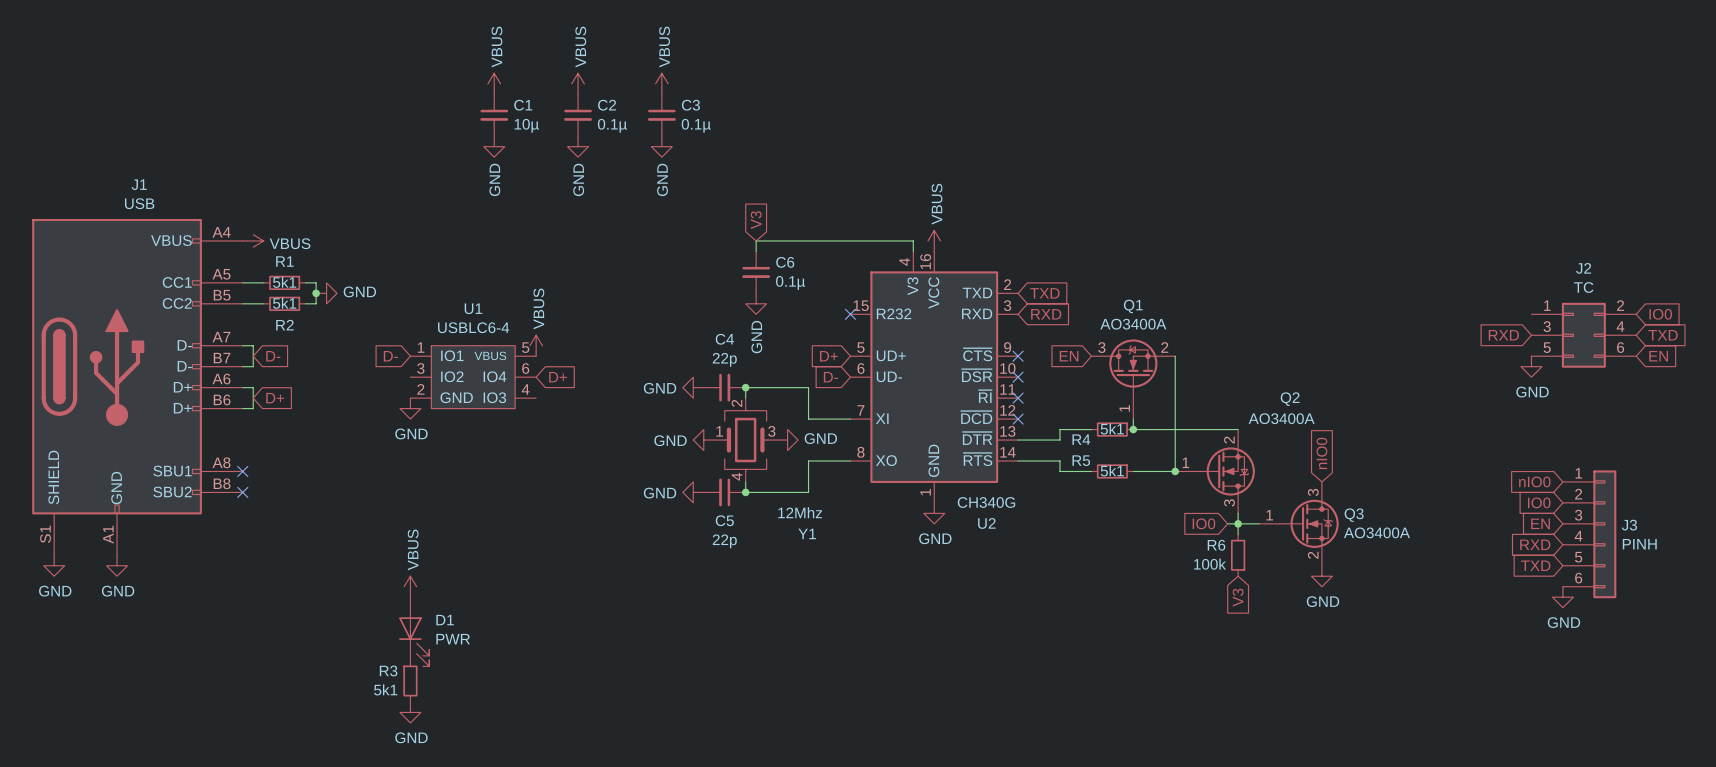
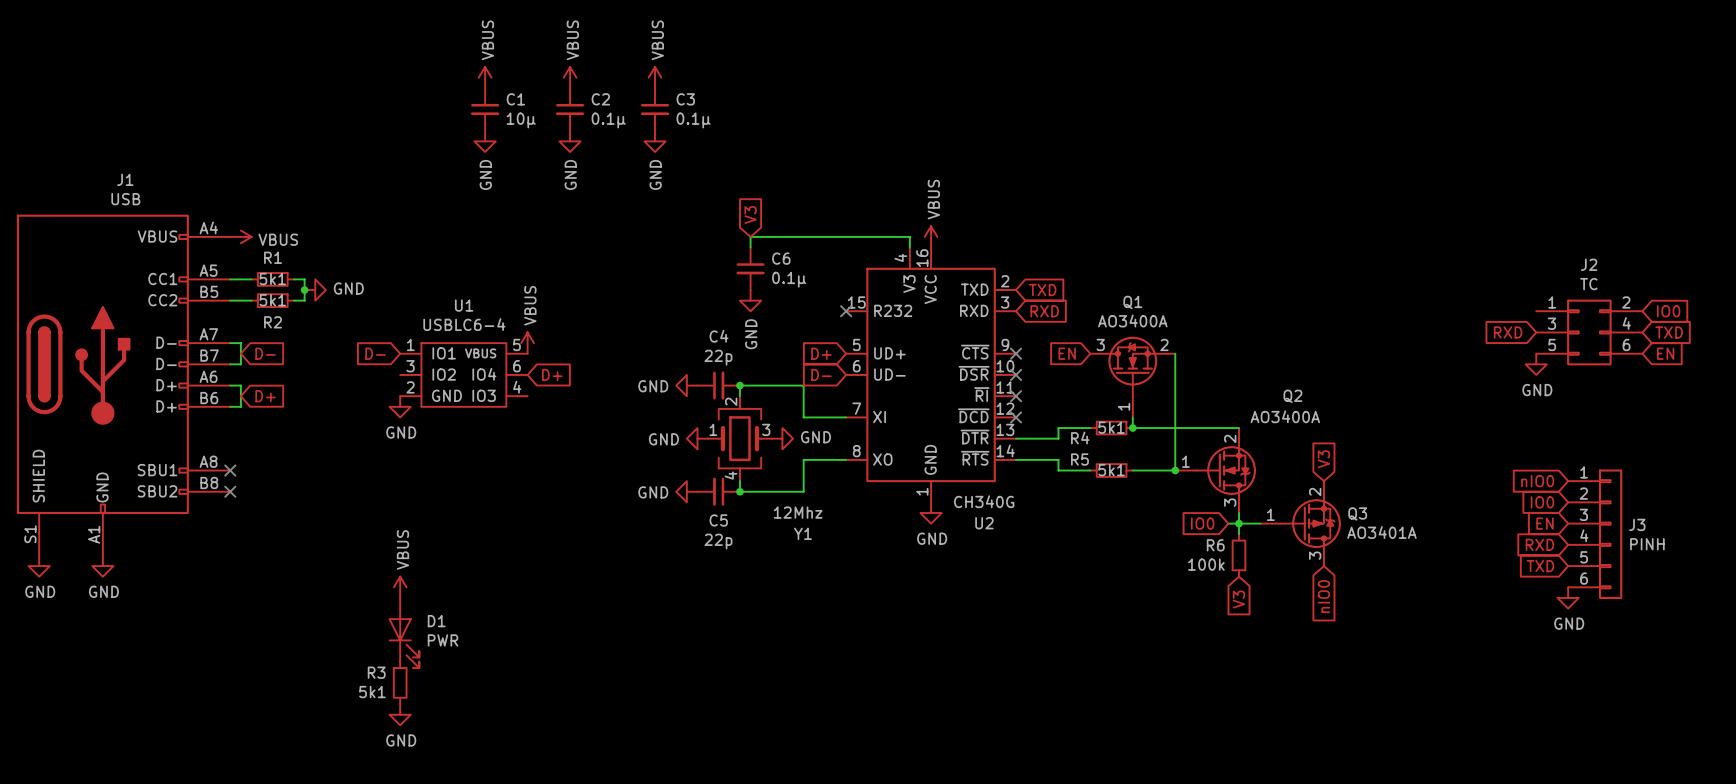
global label: nIO0 (1321, 453) -> V3 (1323, 459)
Q3 symbol: [1259, 481, 1339, 566] -> [1260, 481, 1341, 567]
Q3 value: AO3400A (1376, 532) -> AO3401A (1381, 532)
power symbol: GND (1321, 576) -> none
global label: none -> nIO0 (1323, 596)

